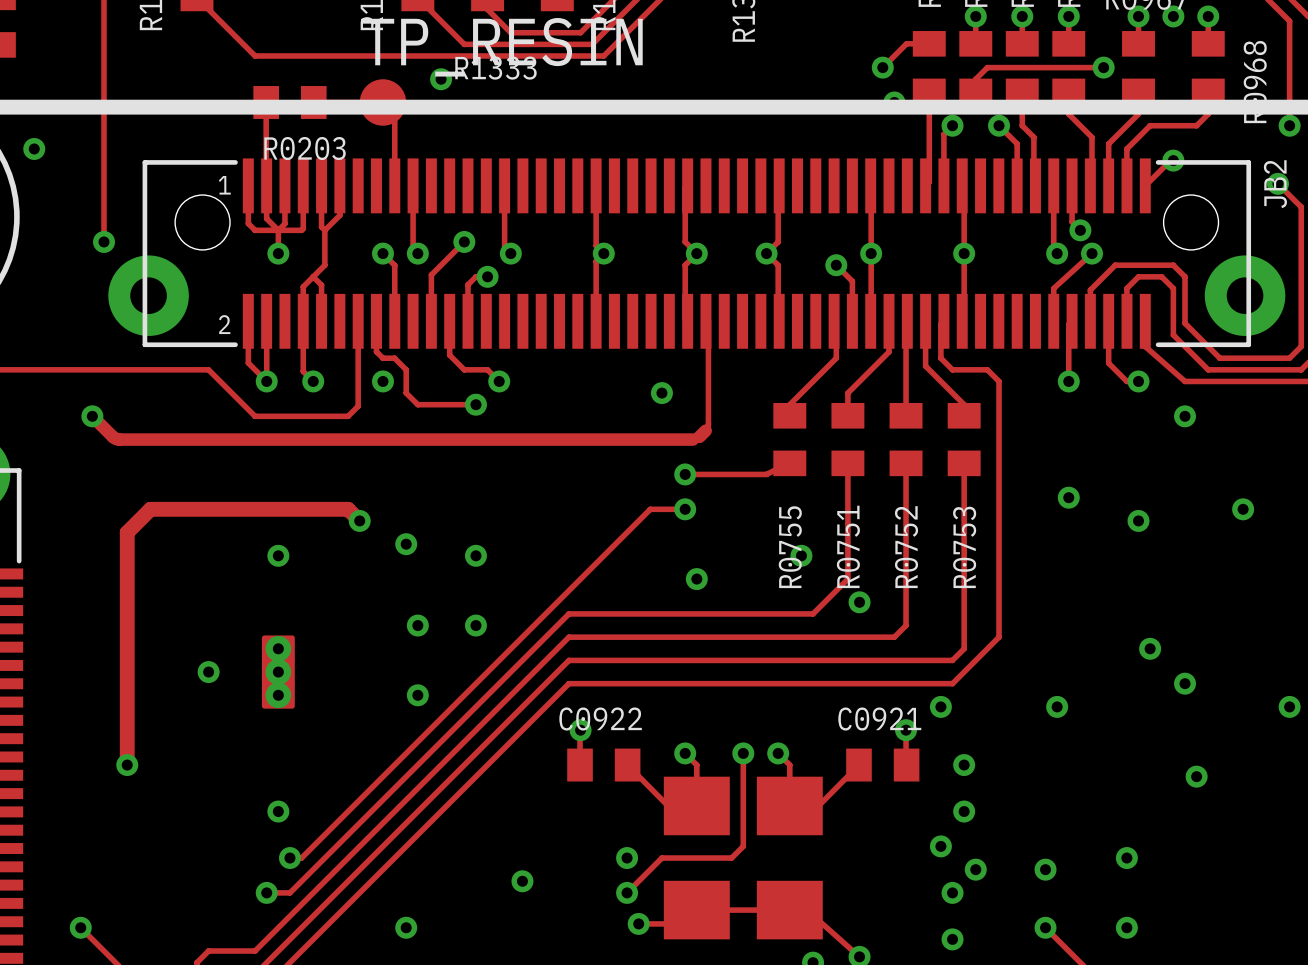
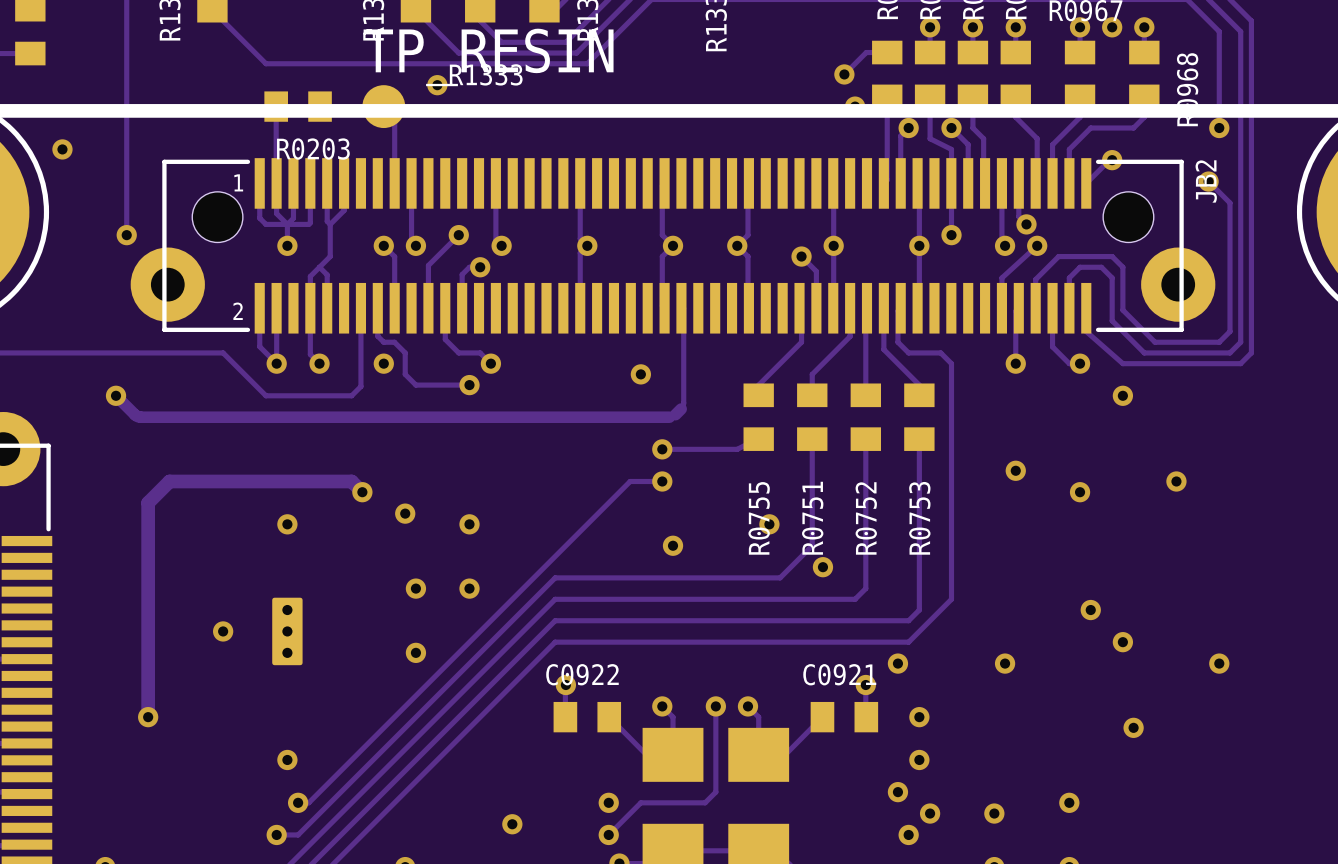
track: (1103, 67) (987, 67) (975, 79) (975, 91) -> (951, 235) (951, 149) (930, 138) (930, 96)
via: (1103, 67) -> none
via: none -> (951, 235)

